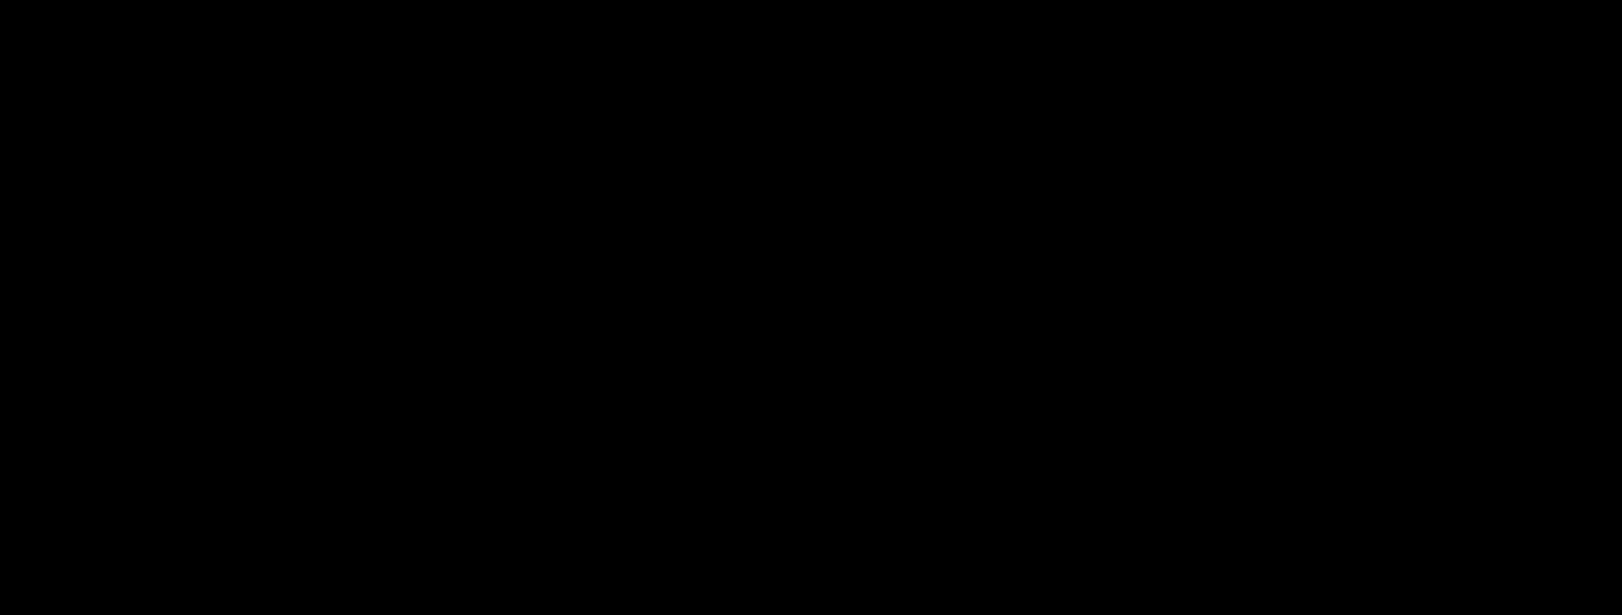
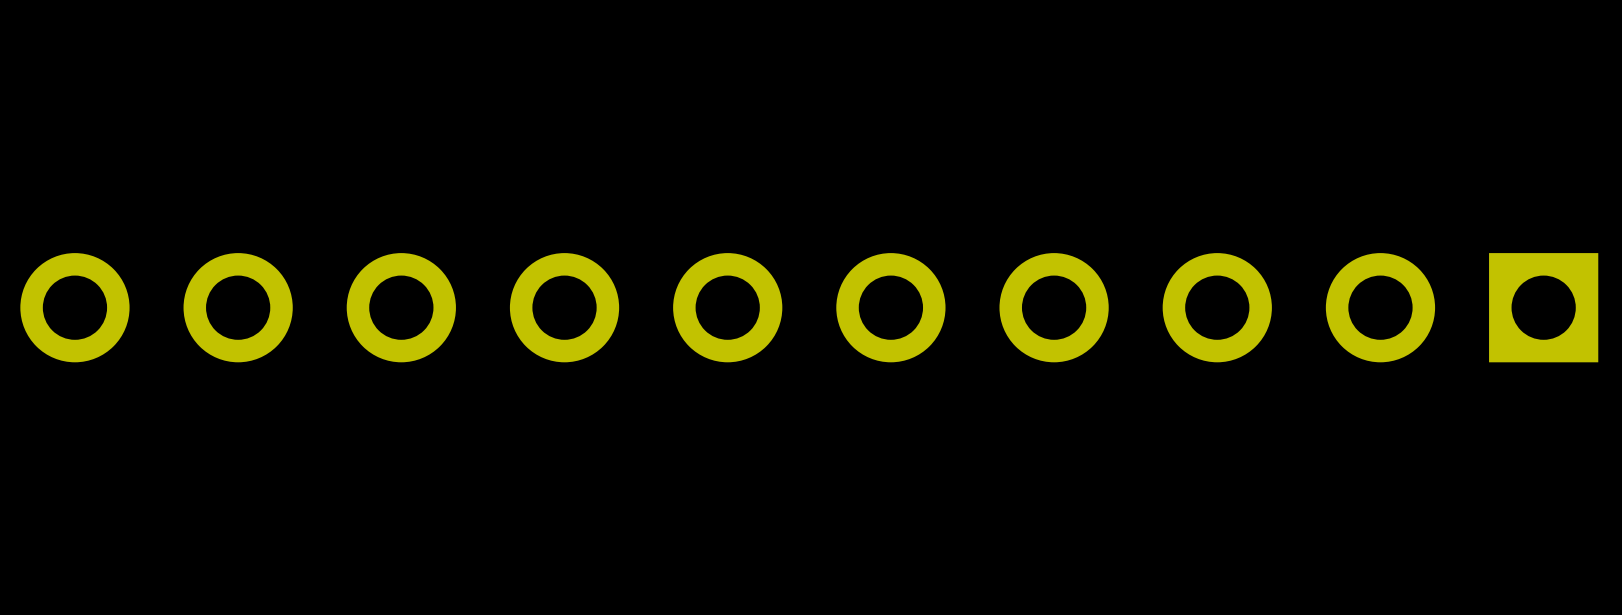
part: none -> (809, 307)

